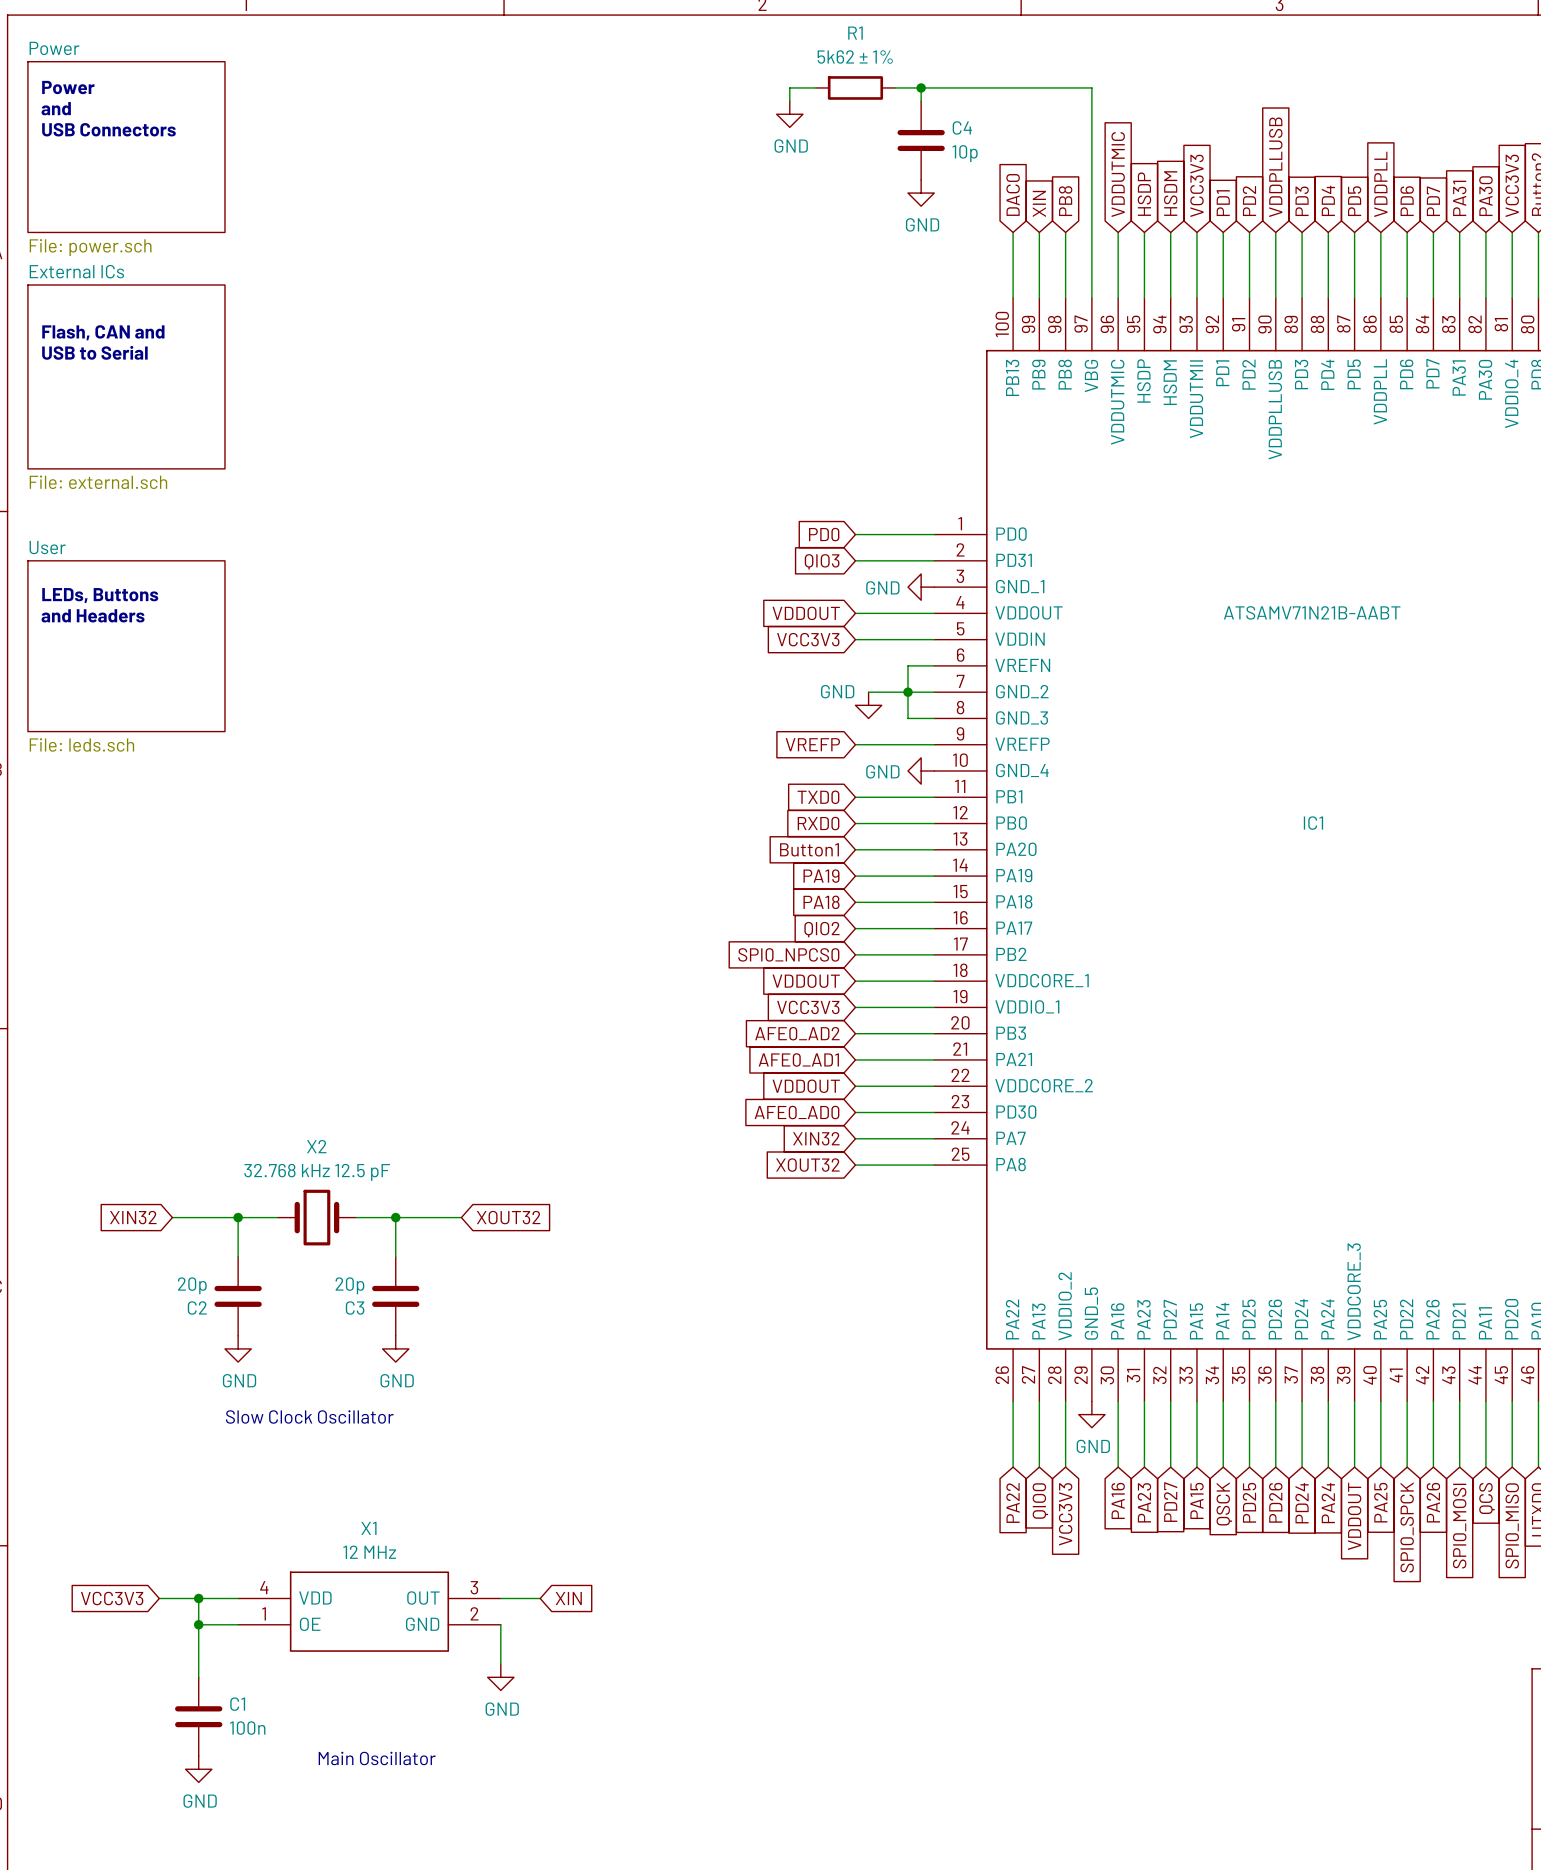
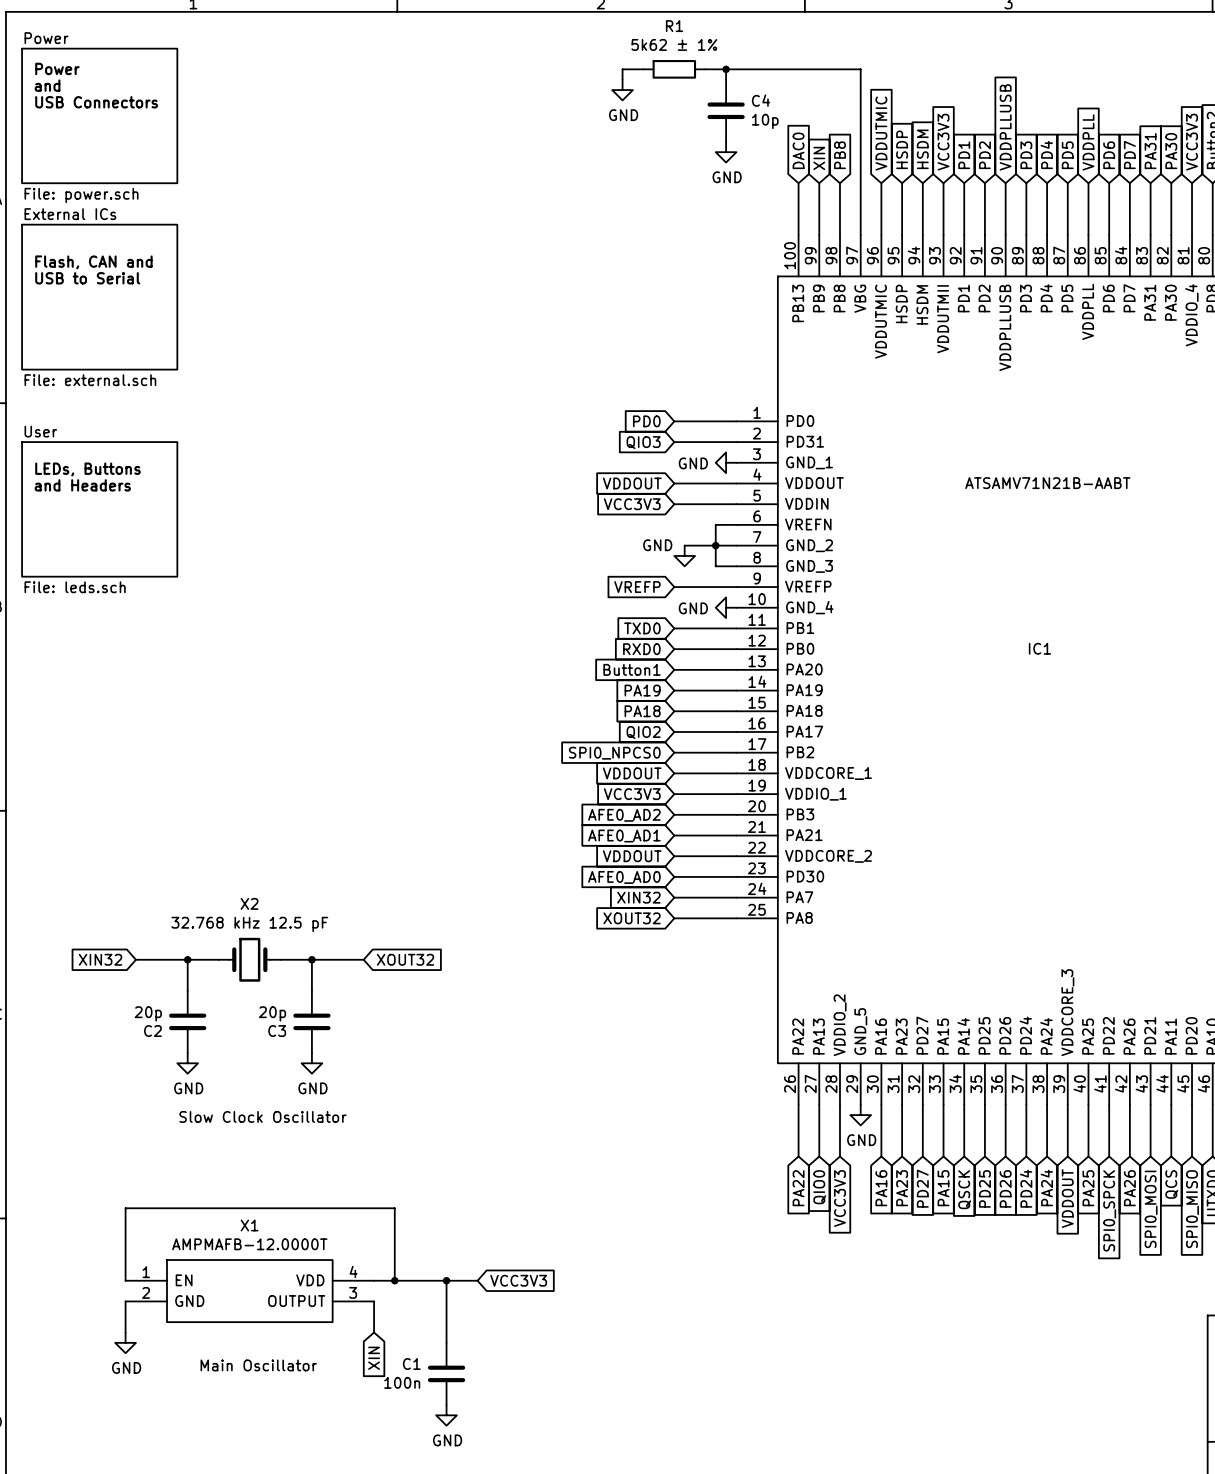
X1 value: 12 MHz (369, 1552) -> AMPMAFB-12.0000T (249, 1244)
X1 symbol: [238, 1571, 501, 1652] -> [125, 1259, 375, 1323]
global label: VCC3V3 (112, 1598) -> none
wire: (159, 1598) (238, 1598) -> none
wire: (198, 1598) (198, 1677) -> none
junction: (198, 1598) -> none
wire: (500, 1598) (540, 1598) -> none
global label rotation: 0° (568, 1598) -> 90° clockwise (374, 1358)
global label position: XIN (568, 1598) -> XIN (374, 1358)
wire: (198, 1624) (238, 1624) -> none
junction: (198, 1624) -> none
wire: none -> (374, 1280) (477, 1280)
wire: (500, 1624) (500, 1664) -> (394, 1280) (394, 1208) (125, 1208) (125, 1280)
junction: none -> (394, 1280)
wire: none -> (446, 1280) (446, 1342)
junction: none -> (446, 1280)
global label: none -> VCC3V3 (518, 1280)
wire: none -> (125, 1301) (125, 1332)
wire: none -> (374, 1301) (374, 1332)
power symbol position: GND (500, 1677) -> GND (446, 1415)
C1 name position: C1 (237, 1704) -> C1 (411, 1364)
C1 position: (198, 1716) -> (446, 1373)
C1 value position: 100n (247, 1728) -> 100n (402, 1382)
text position: Main Oscillator (377, 1758) -> Main Oscillator (258, 1365)
power symbol position: GND (198, 1769) -> GND (125, 1342)

